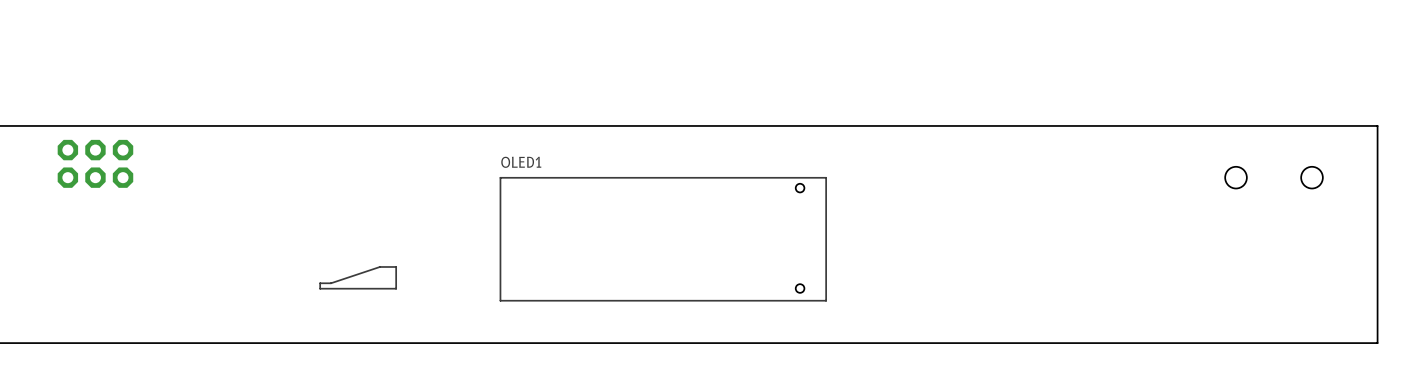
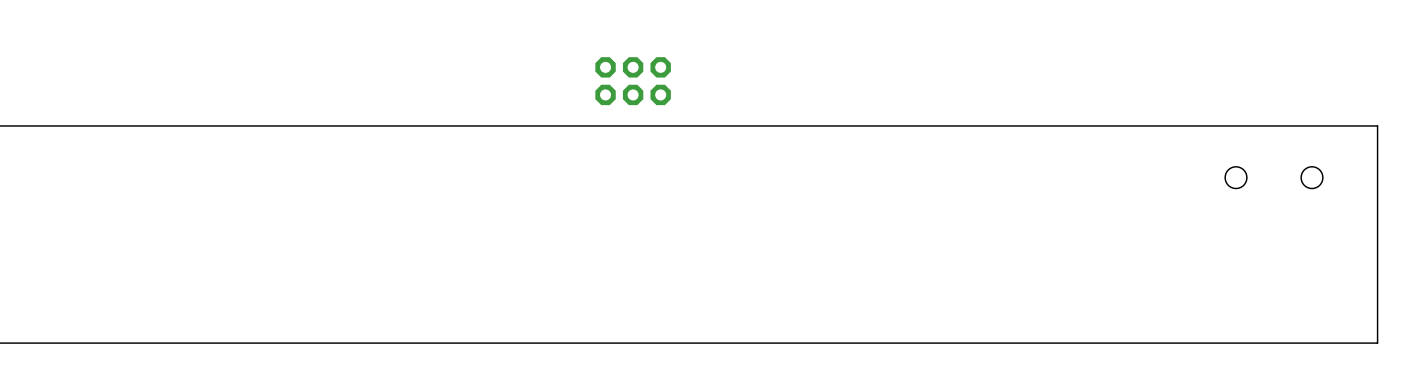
part: none -> (633, 81)
part: (95, 163) -> none
OLED1: (663, 239) -> none
part: (358, 277) -> none

